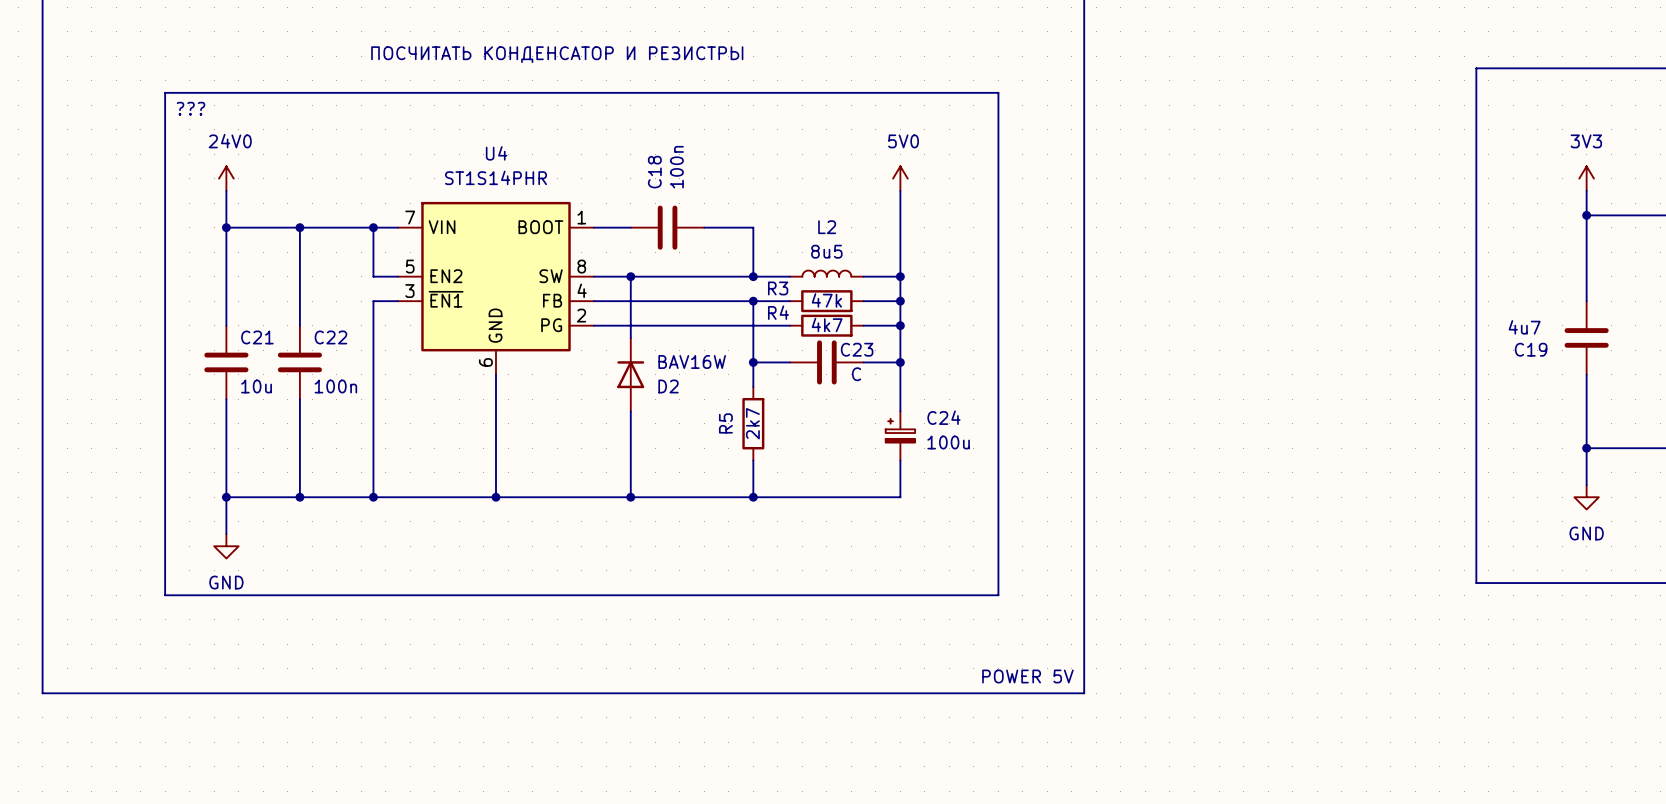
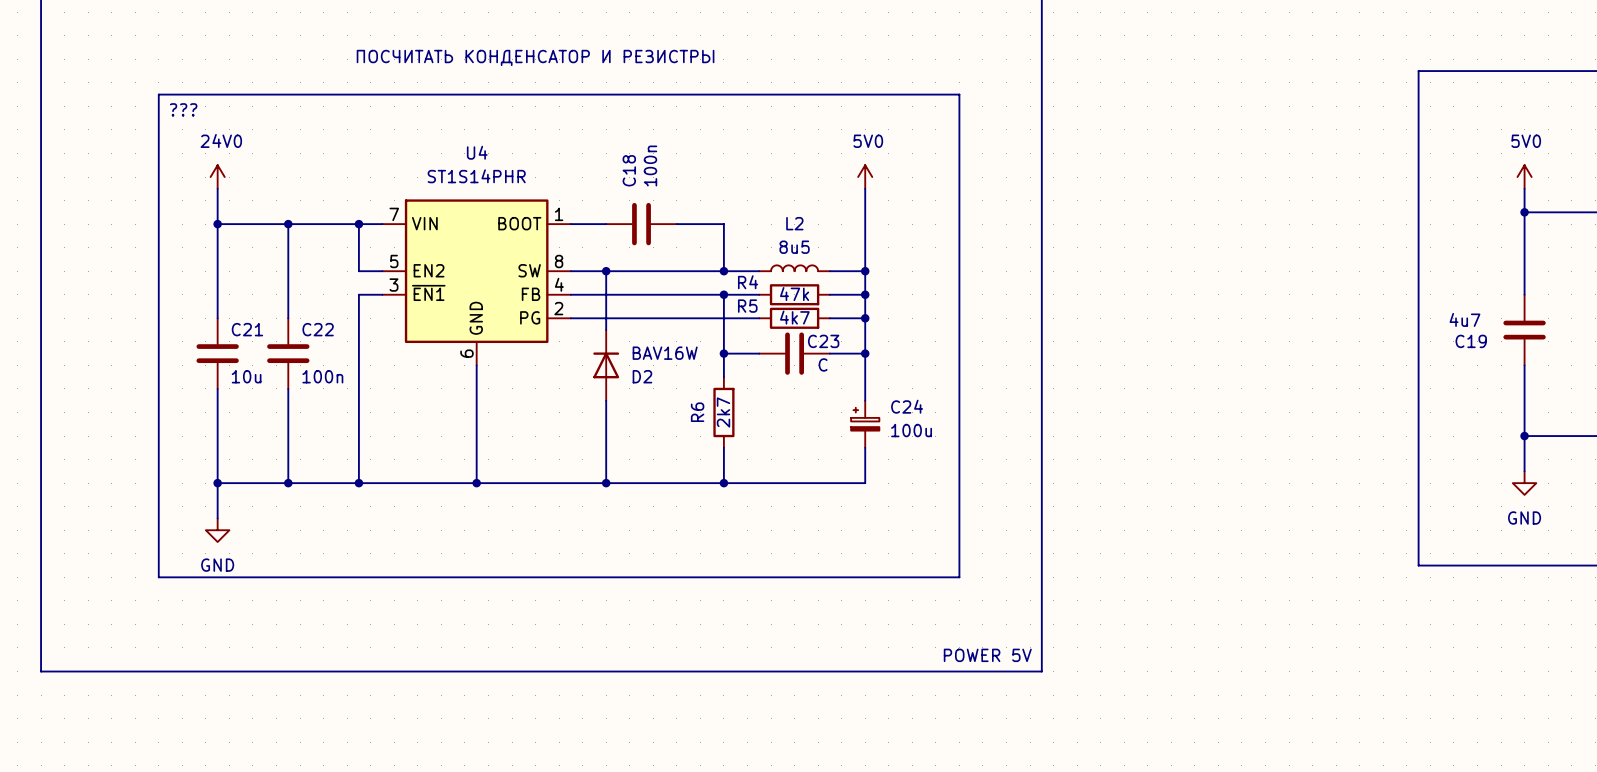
power symbol: 3V3 (1586, 178) -> 5V0 (1524, 177)
R3 name: R3 (778, 288) -> R4 (748, 282)
R4 name: R4 (778, 312) -> R5 (747, 306)
R5 name: R5 (725, 423) -> R6 (697, 412)

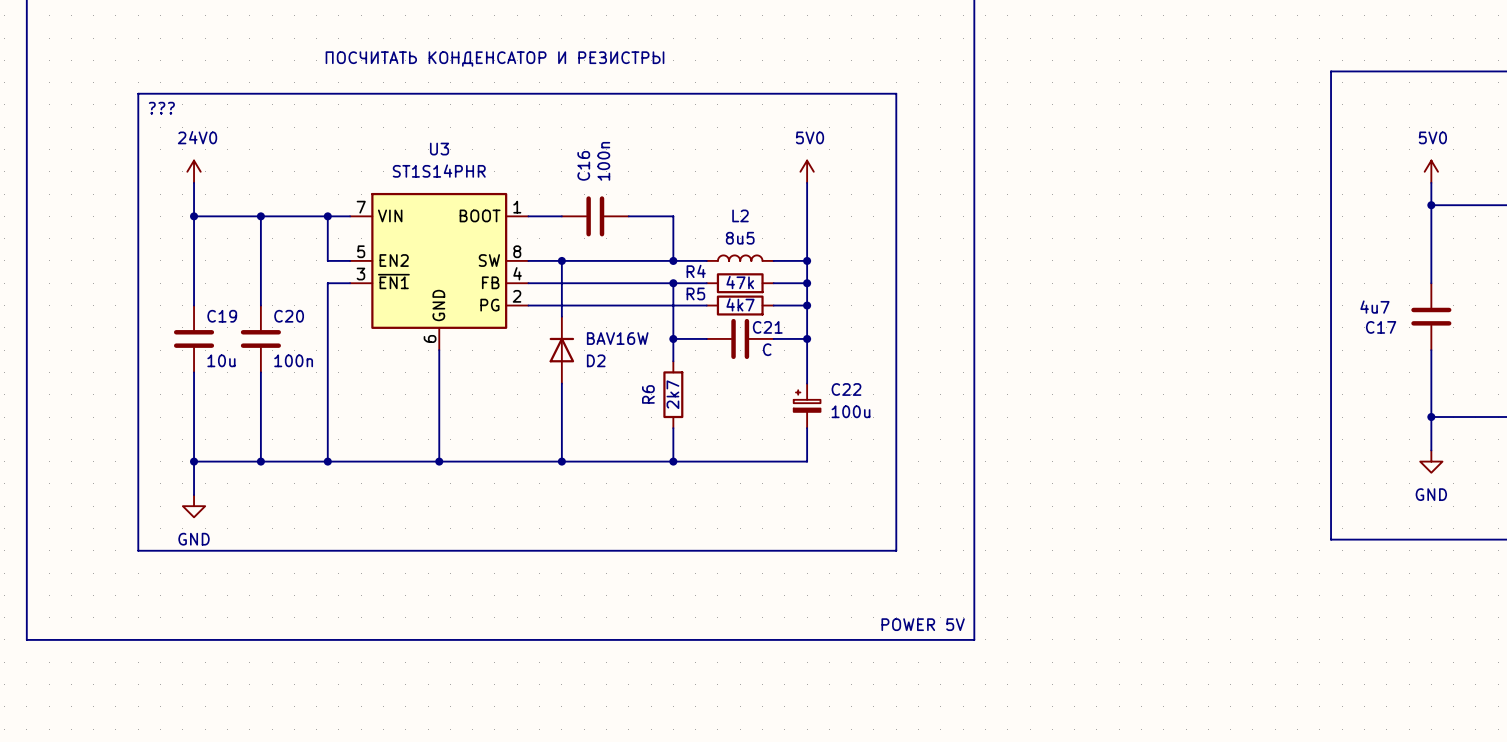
U4 name: U4 (477, 152) -> U3 (439, 149)
C18 name: C18 (629, 170) -> C16 (583, 165)
C21 name: C21 (247, 329) -> C19 (222, 316)
C22 name: C22 (318, 329) -> C20 (289, 316)
C23 name: C23 (823, 341) -> C21 (767, 327)
C19 name: C19 (1471, 341) -> C17 (1381, 327)
C24 name: C24 (907, 406) -> C22 (846, 389)

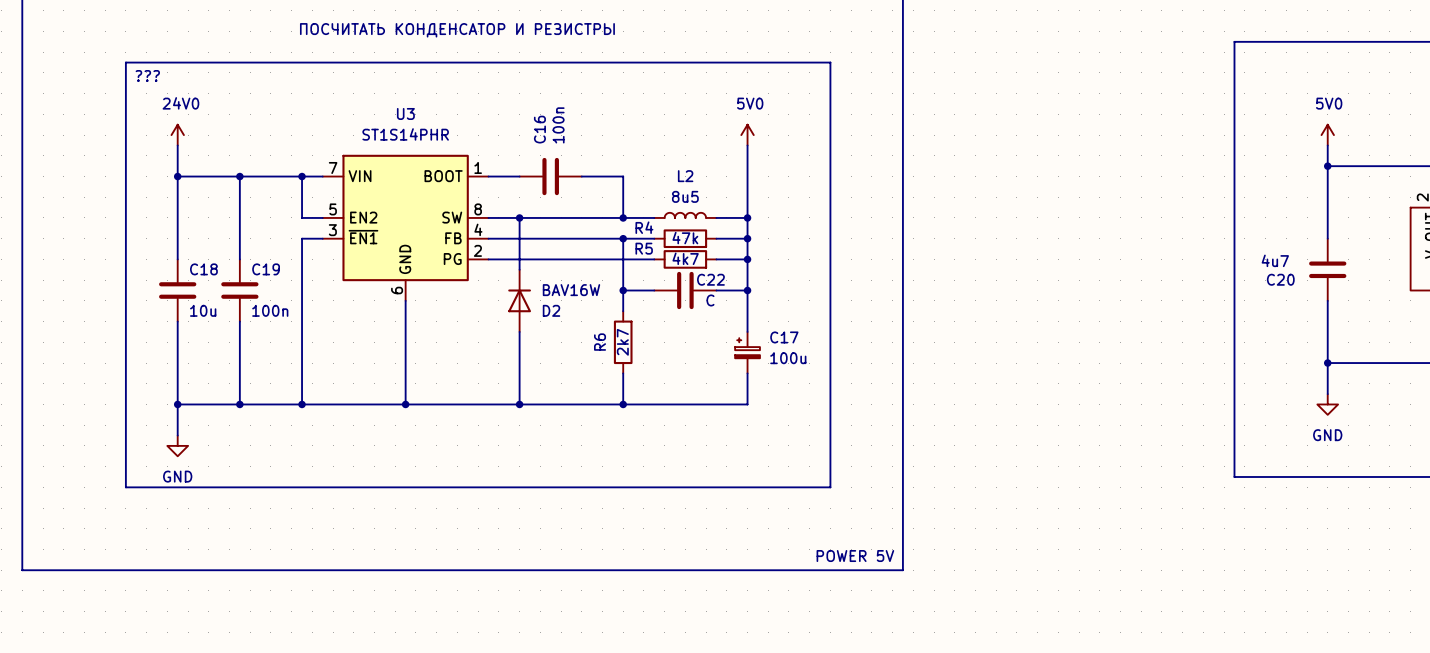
C19 name: C19 (222, 316) -> C18 (203, 269)
C20 name: C20 (289, 316) -> C19 (266, 269)
C21 name: C21 (767, 327) -> C22 (710, 279)
C17 name: C17 (1381, 327) -> C20 (1280, 279)
C22 name: C22 (846, 389) -> C17 (784, 337)

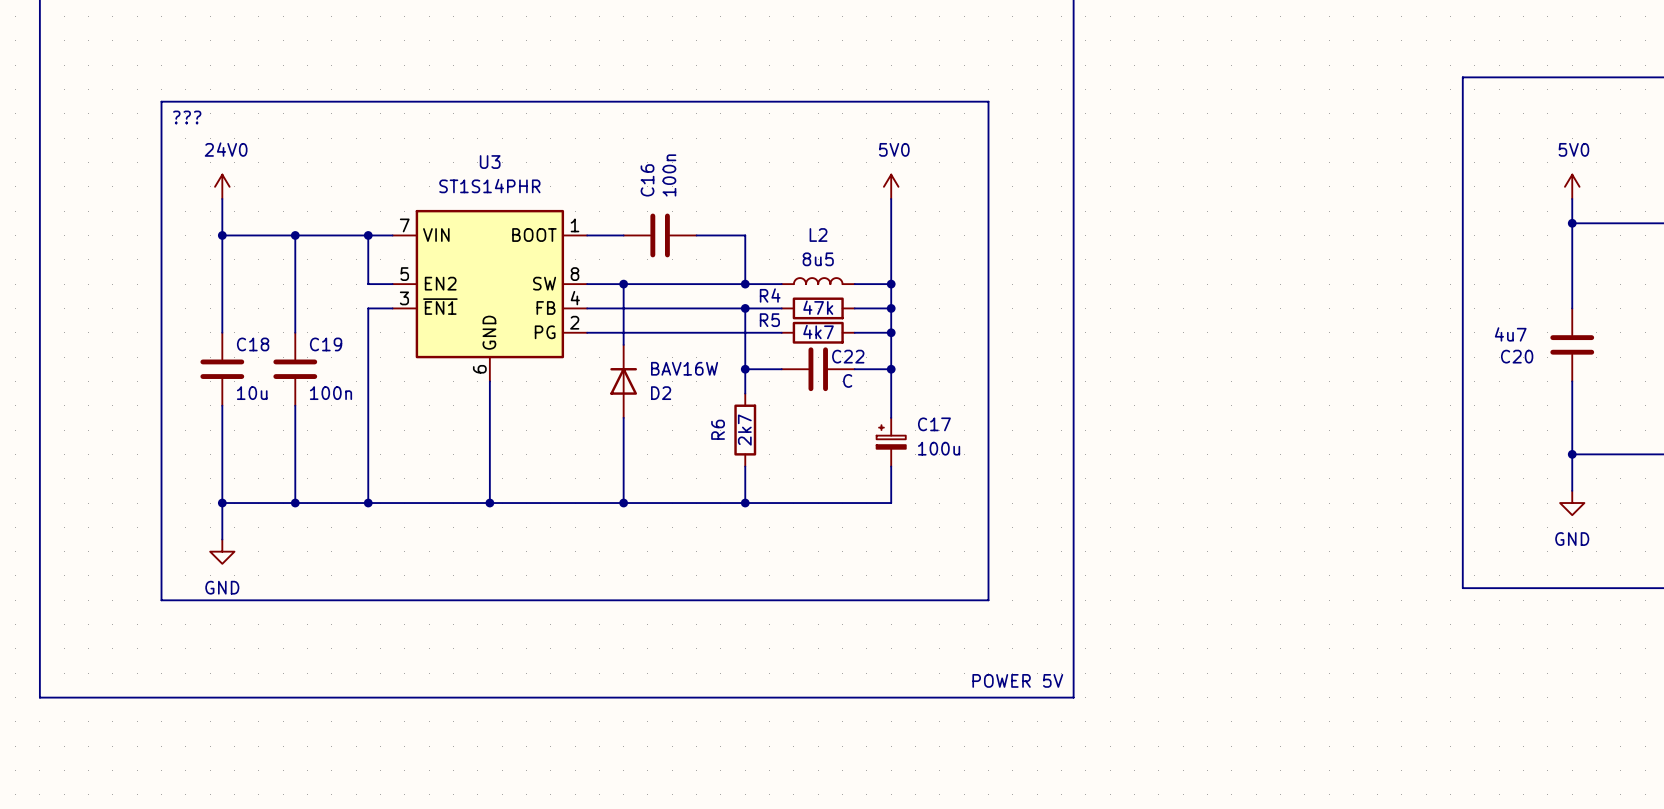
text: ПОСЧИТАТЬ КОНДЕНСАТОР И РЕЗИСТРЫ (457, 30) -> none

